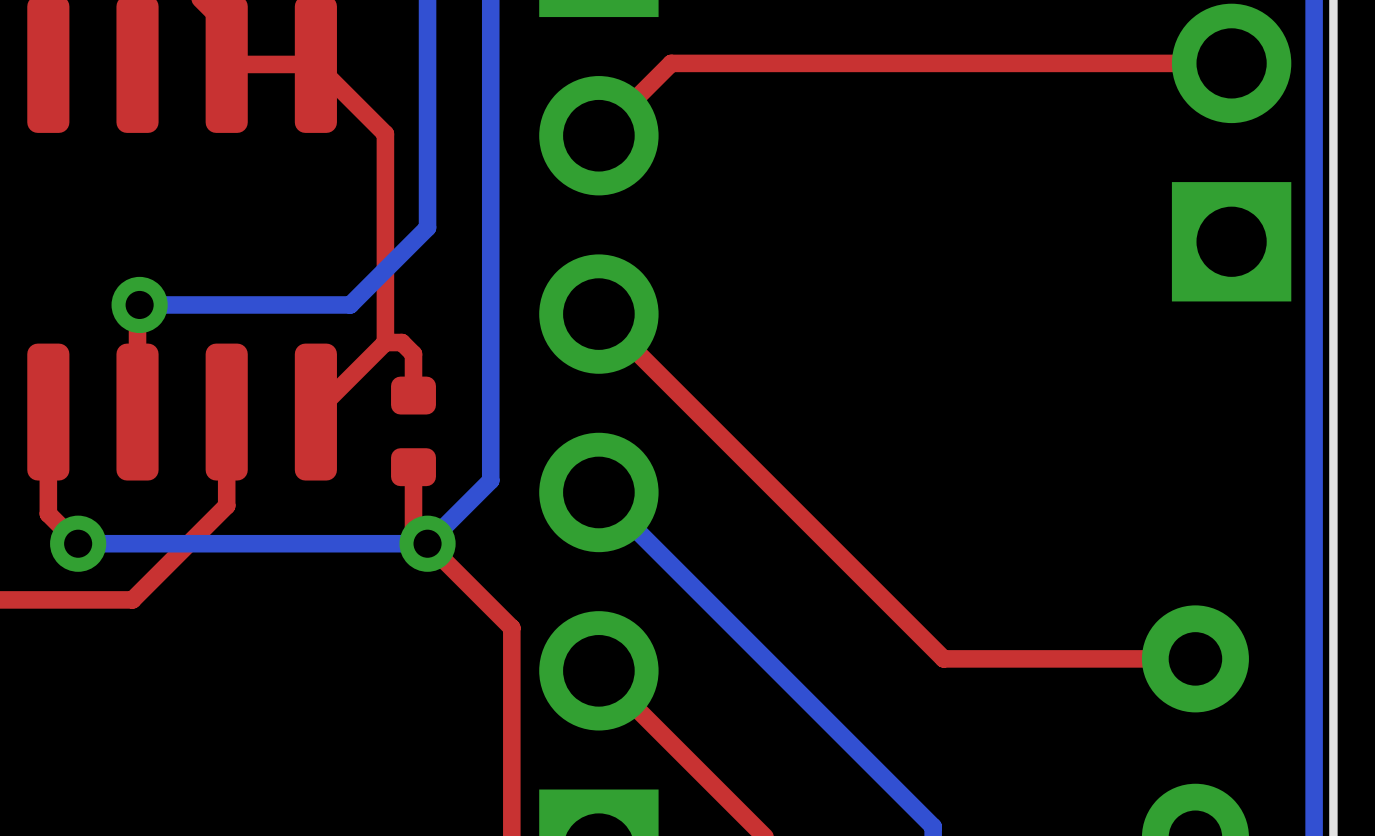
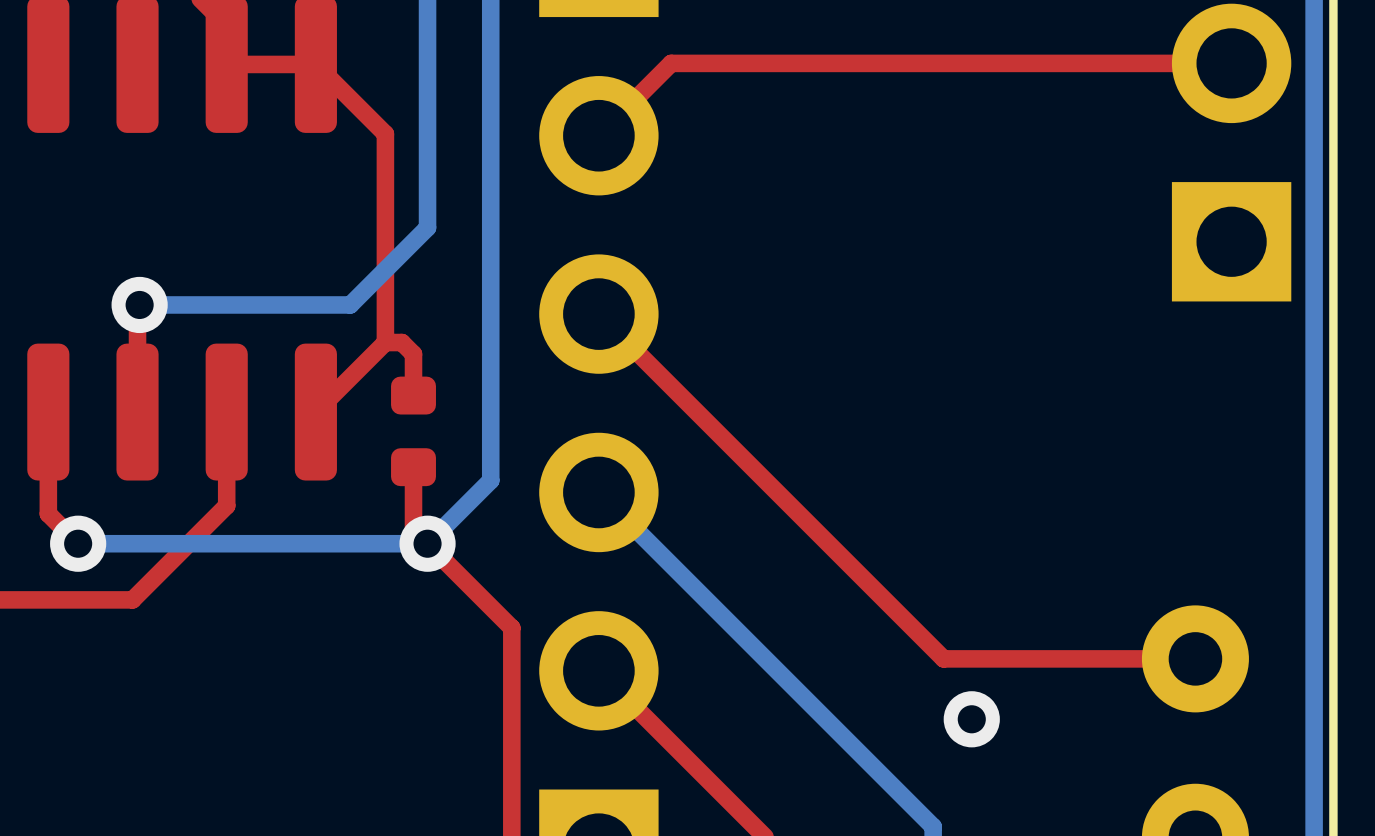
via: none -> (971, 719)

